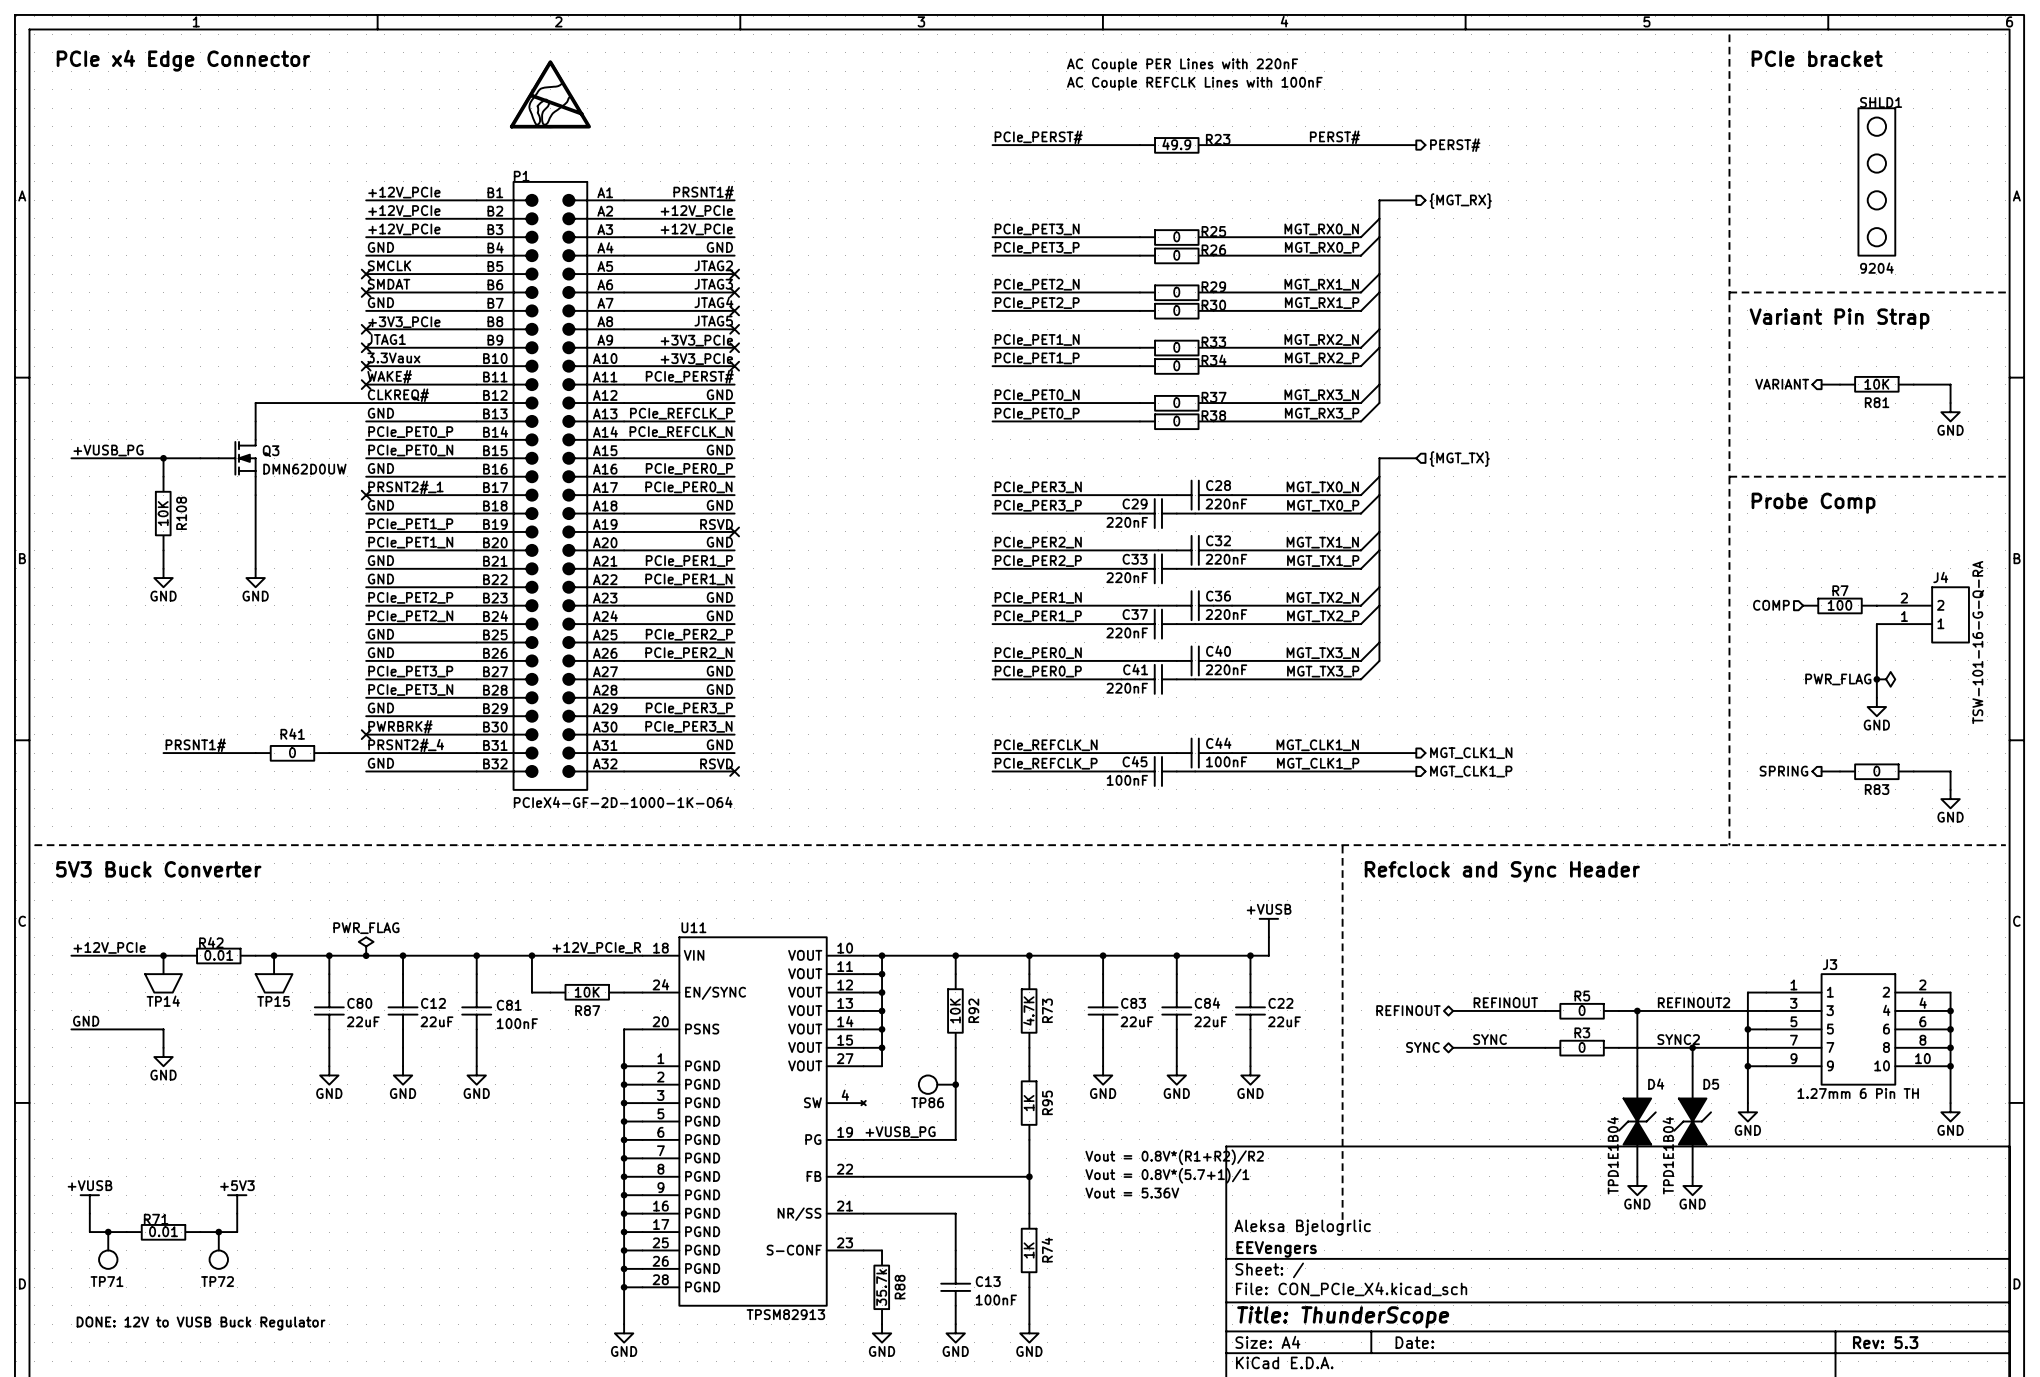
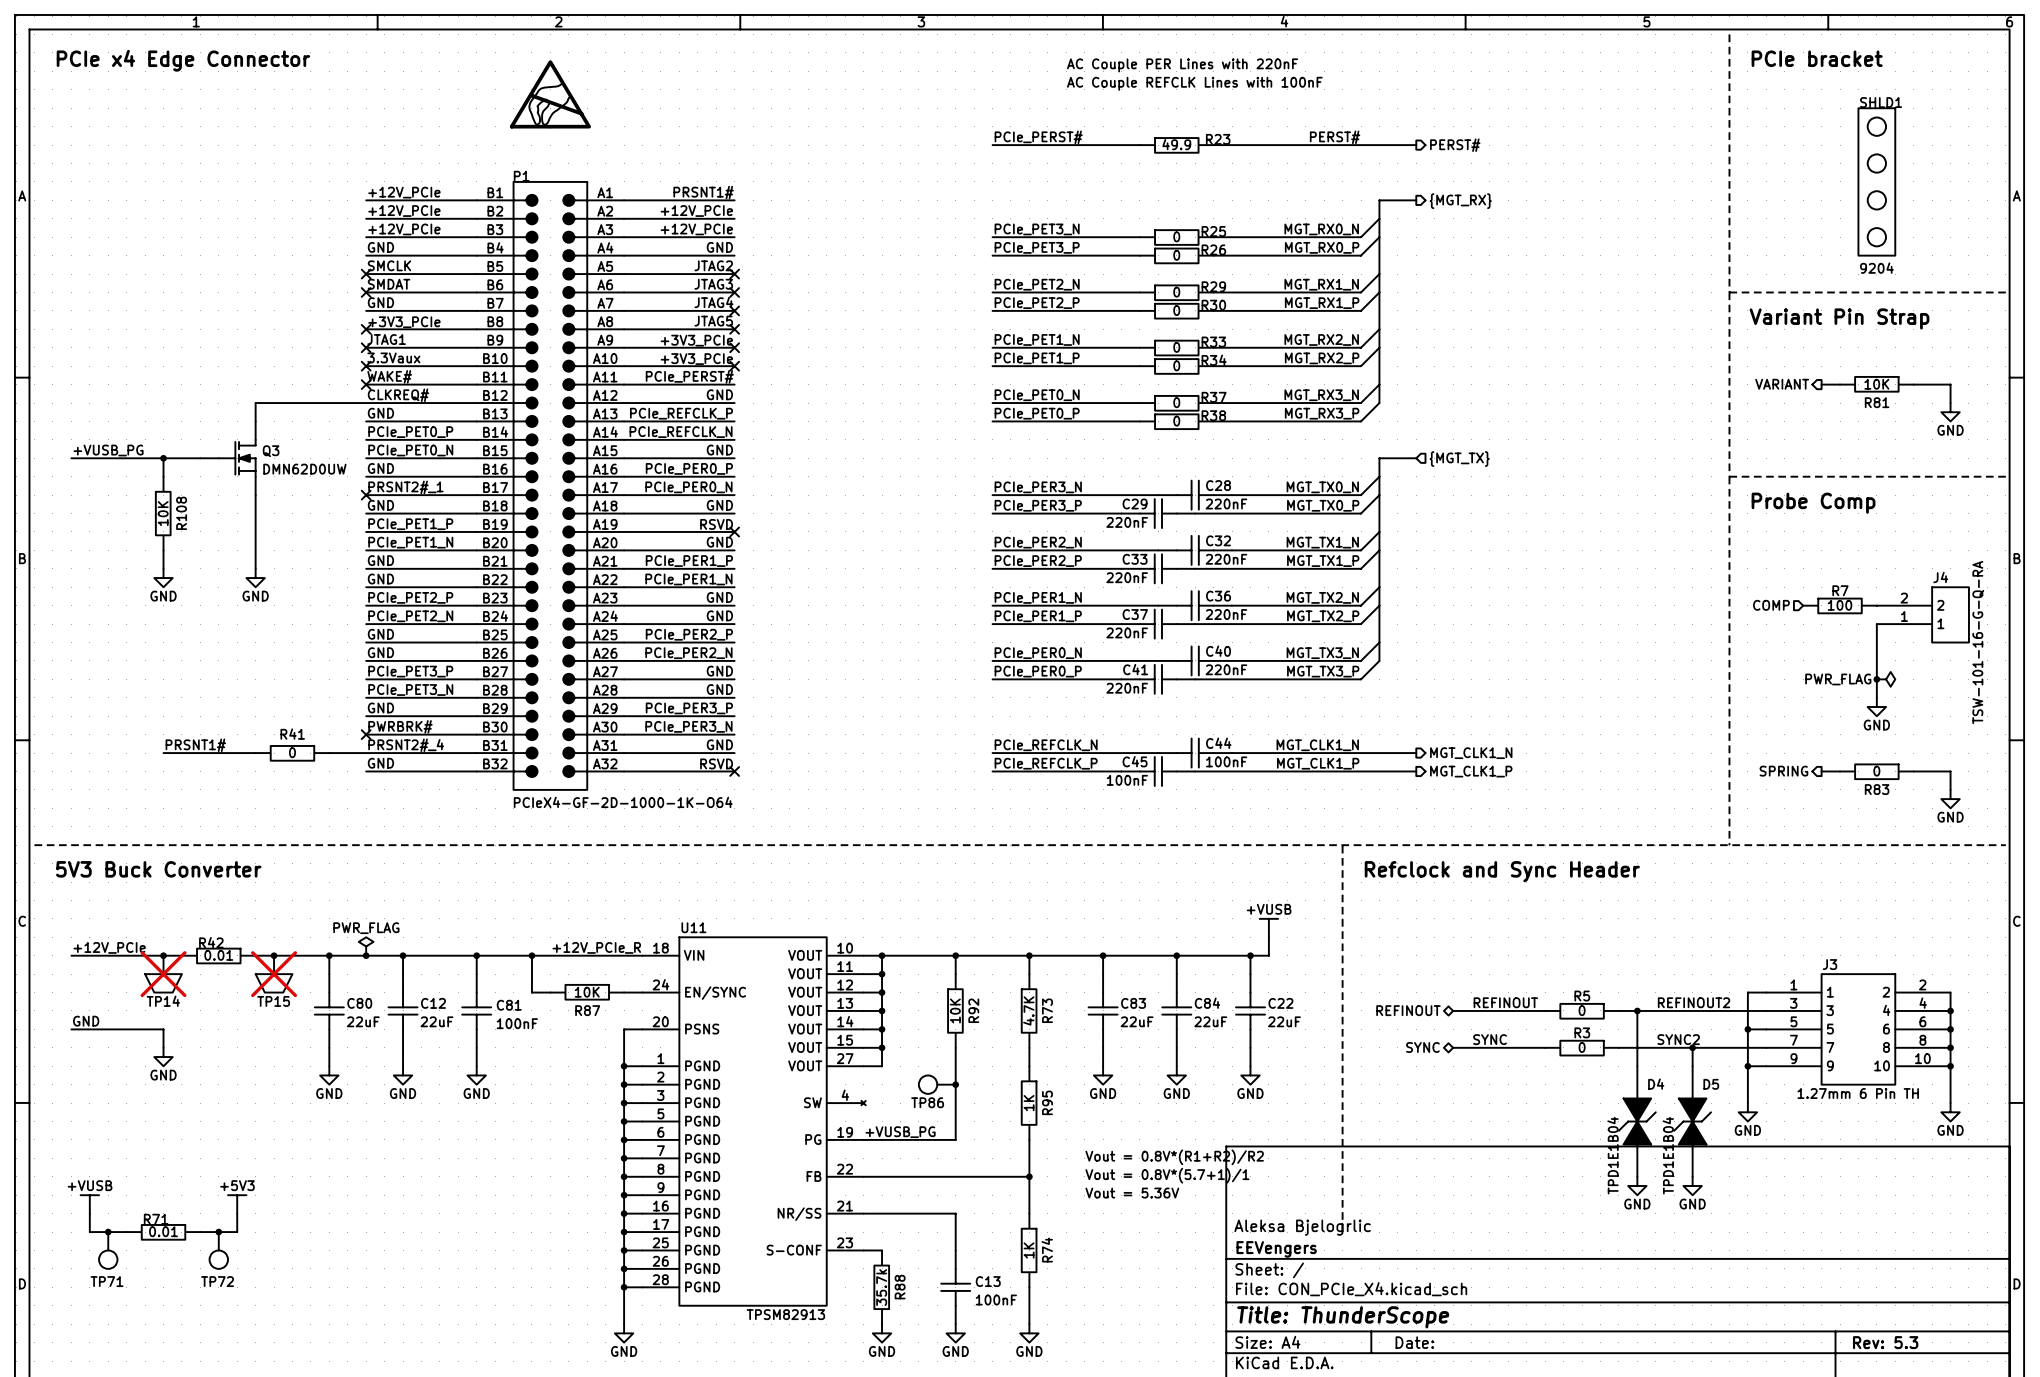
TP14 do-not-place cross: none -> (163, 974)
TP15 do-not-place cross: none -> (274, 974)
text: DONE: 12V to VUSB Buck Regulator (201, 1323) -> none

